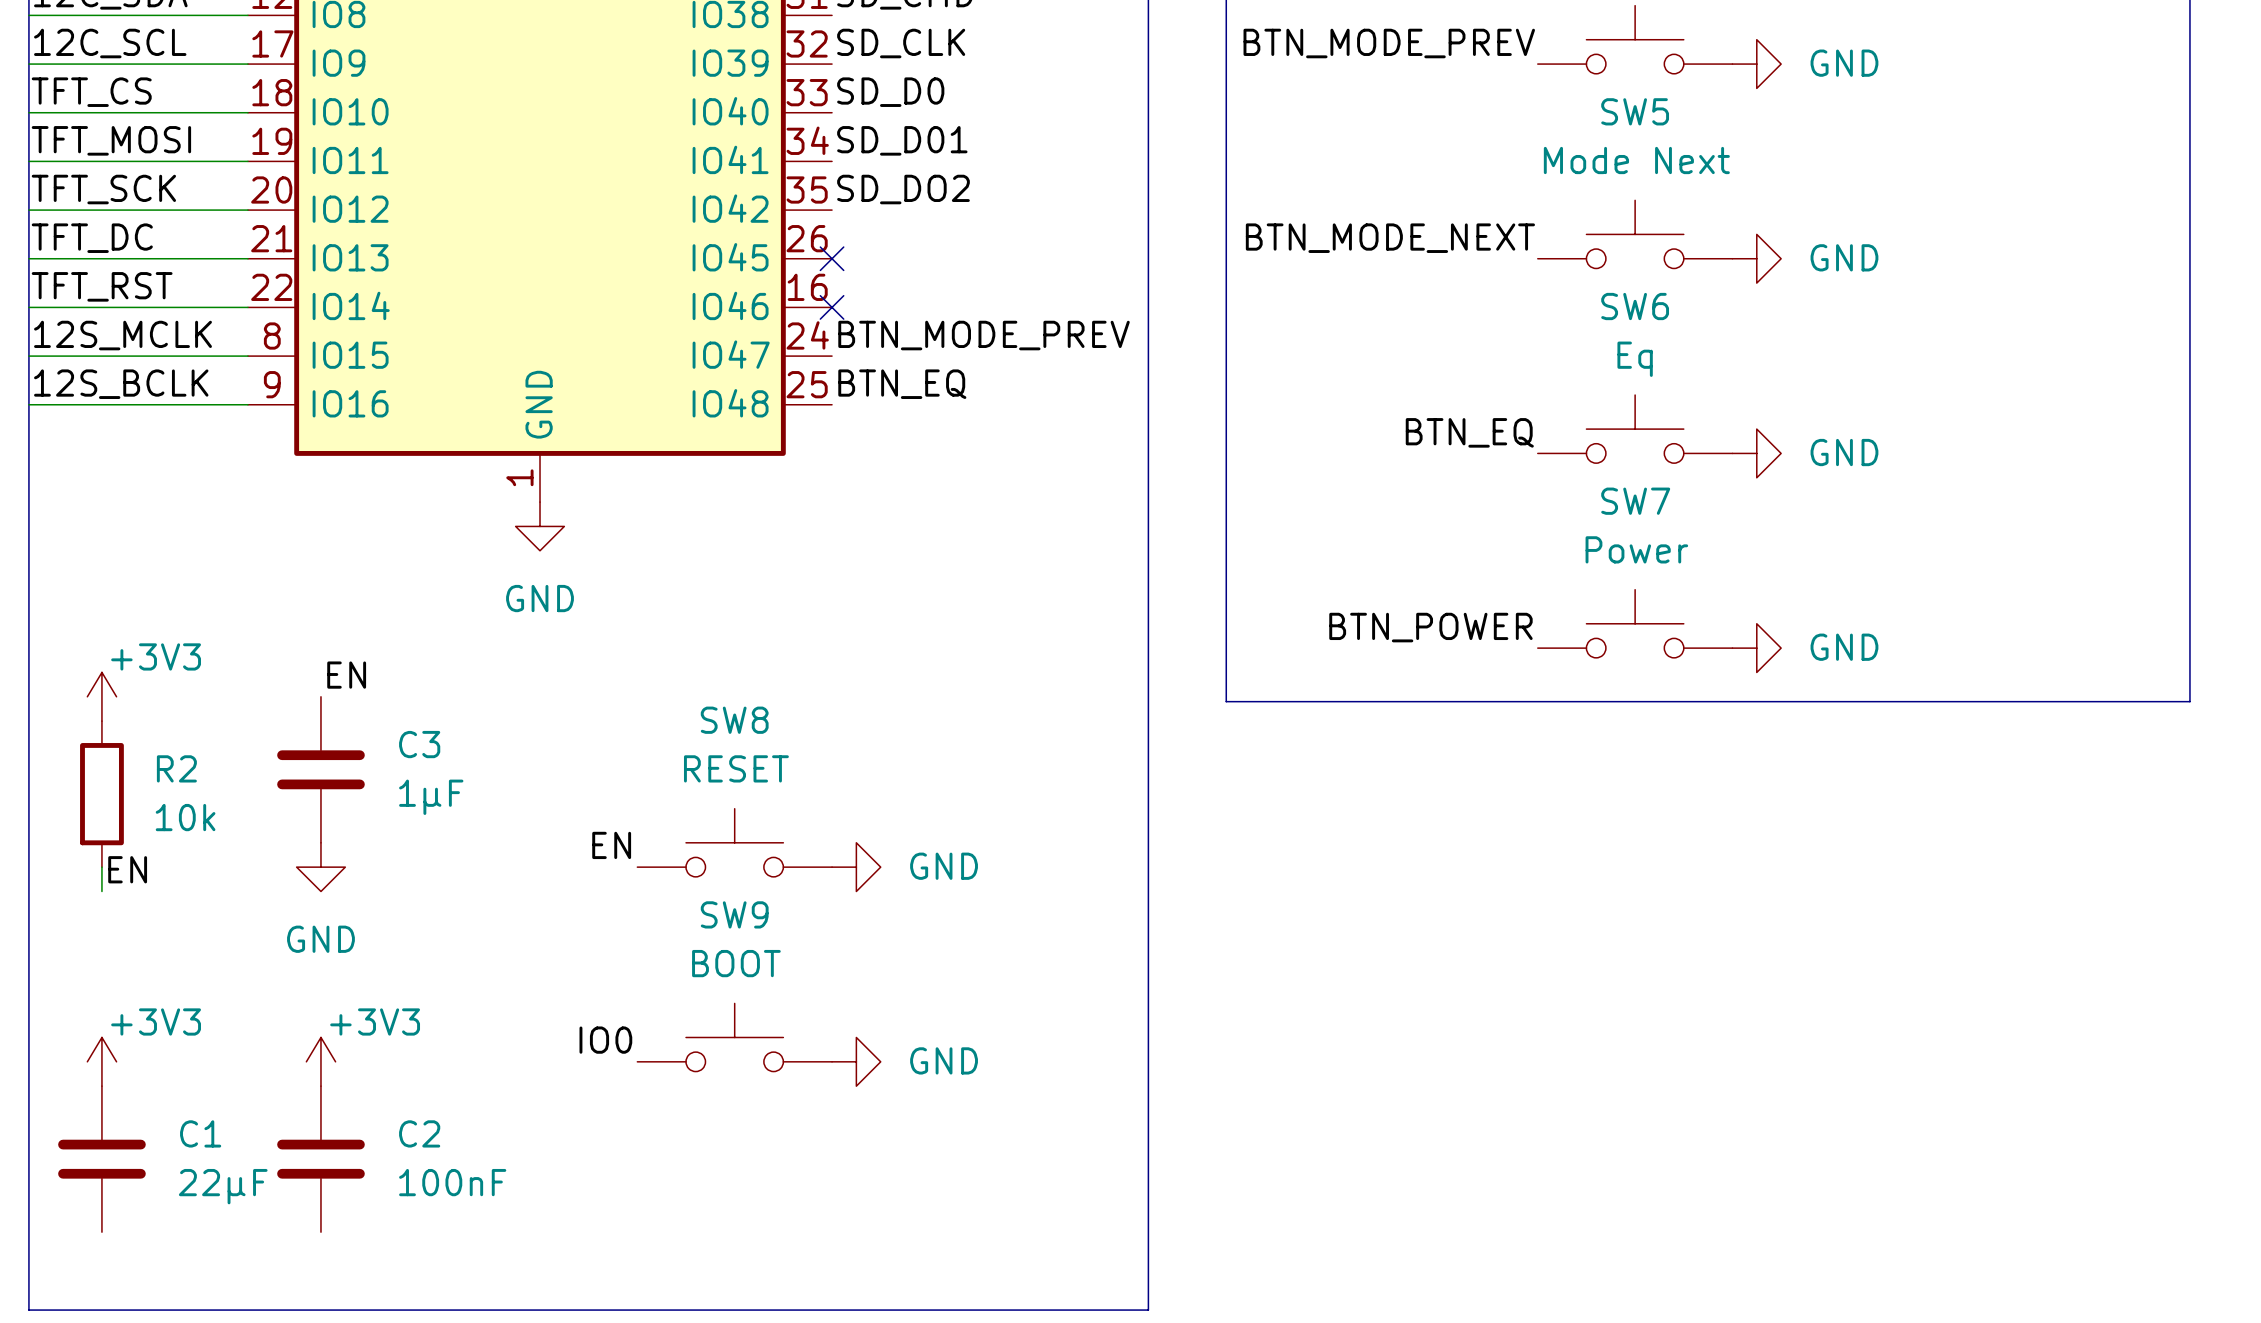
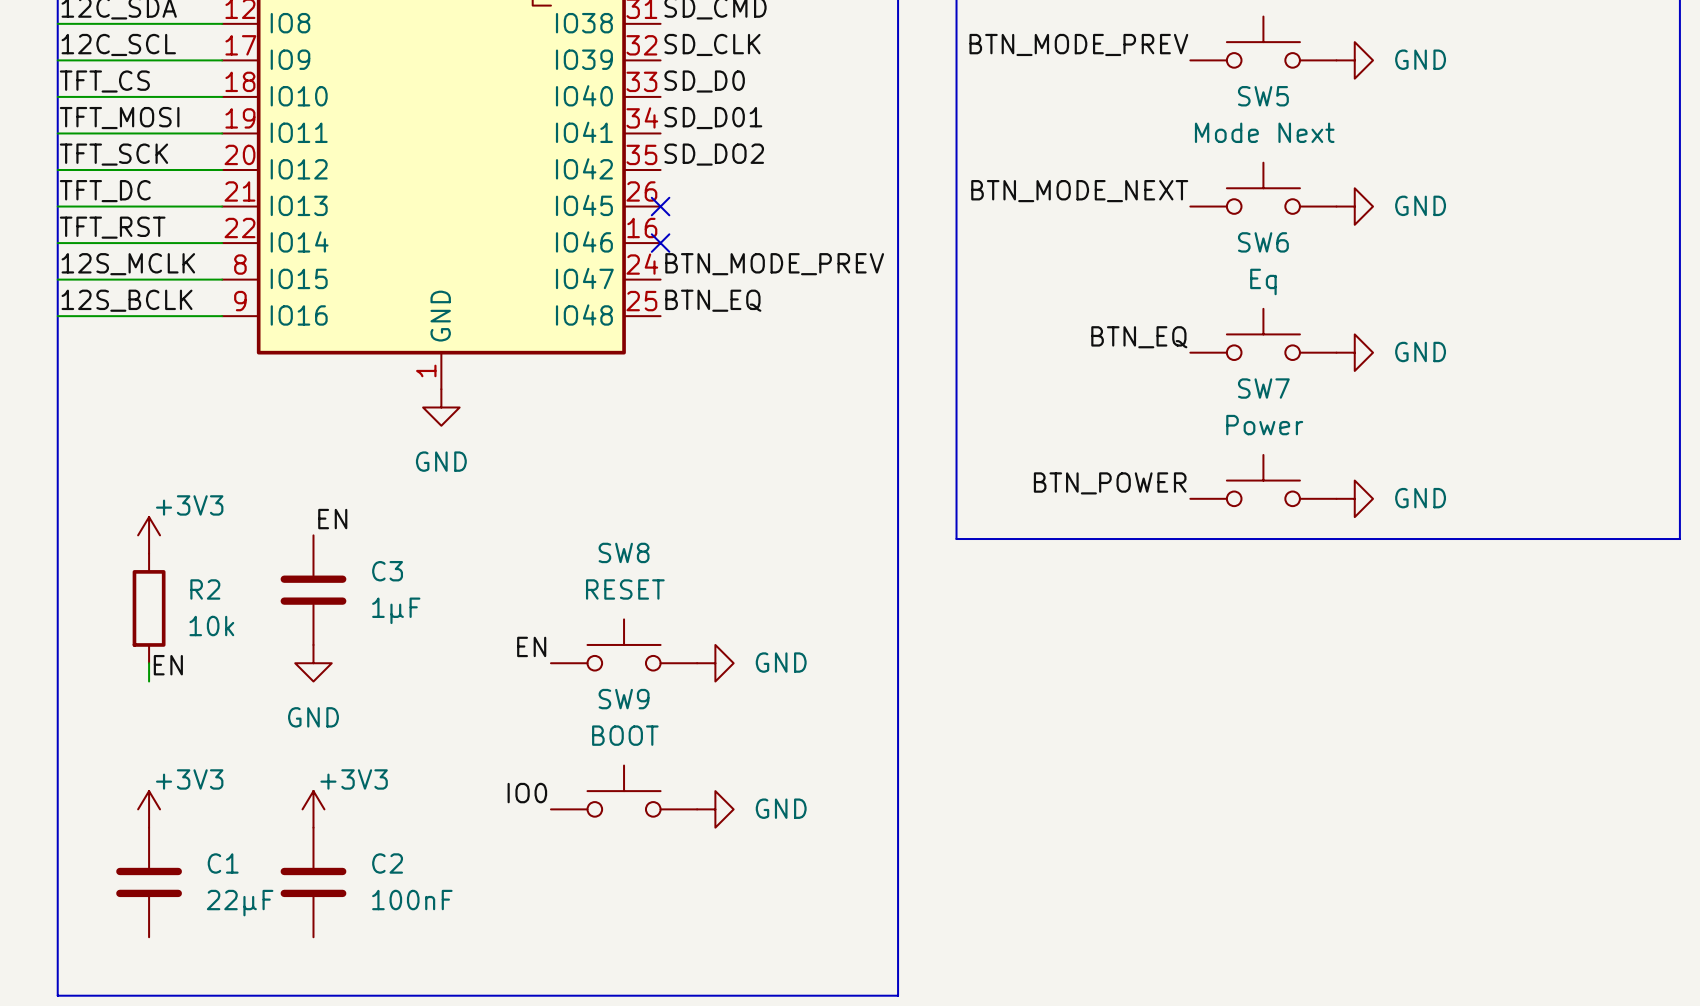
label position: EN (346, 675) -> EN (332, 519)
power symbol position: +3V3 (101, 696) -> +3V3 (149, 535)
C3 position: (320, 769) -> (313, 590)
R2 position: (101, 794) -> (149, 608)
SW8 position: (734, 842) -> (624, 644)
label position: EN (611, 845) -> EN (531, 646)
wire: (101, 867) (101, 891) -> (149, 663) (149, 681)
power symbol position: GND (320, 867) -> GND (313, 663)
power symbol position: GND (856, 867) -> GND (715, 663)
label position: EN (127, 869) -> EN (168, 665)
SW9 position: (734, 1037) -> (624, 791)
label position: IO0 (605, 1040) -> IO0 (527, 793)
power symbol position: +3V3 (101, 1061) -> +3V3 (149, 809)
power symbol position: +3V3 (320, 1061) -> +3V3 (313, 809)
power symbol position: GND (856, 1061) -> GND (715, 809)
C1 position: (101, 1159) -> (149, 882)
C2 position: (320, 1159) -> (313, 882)

